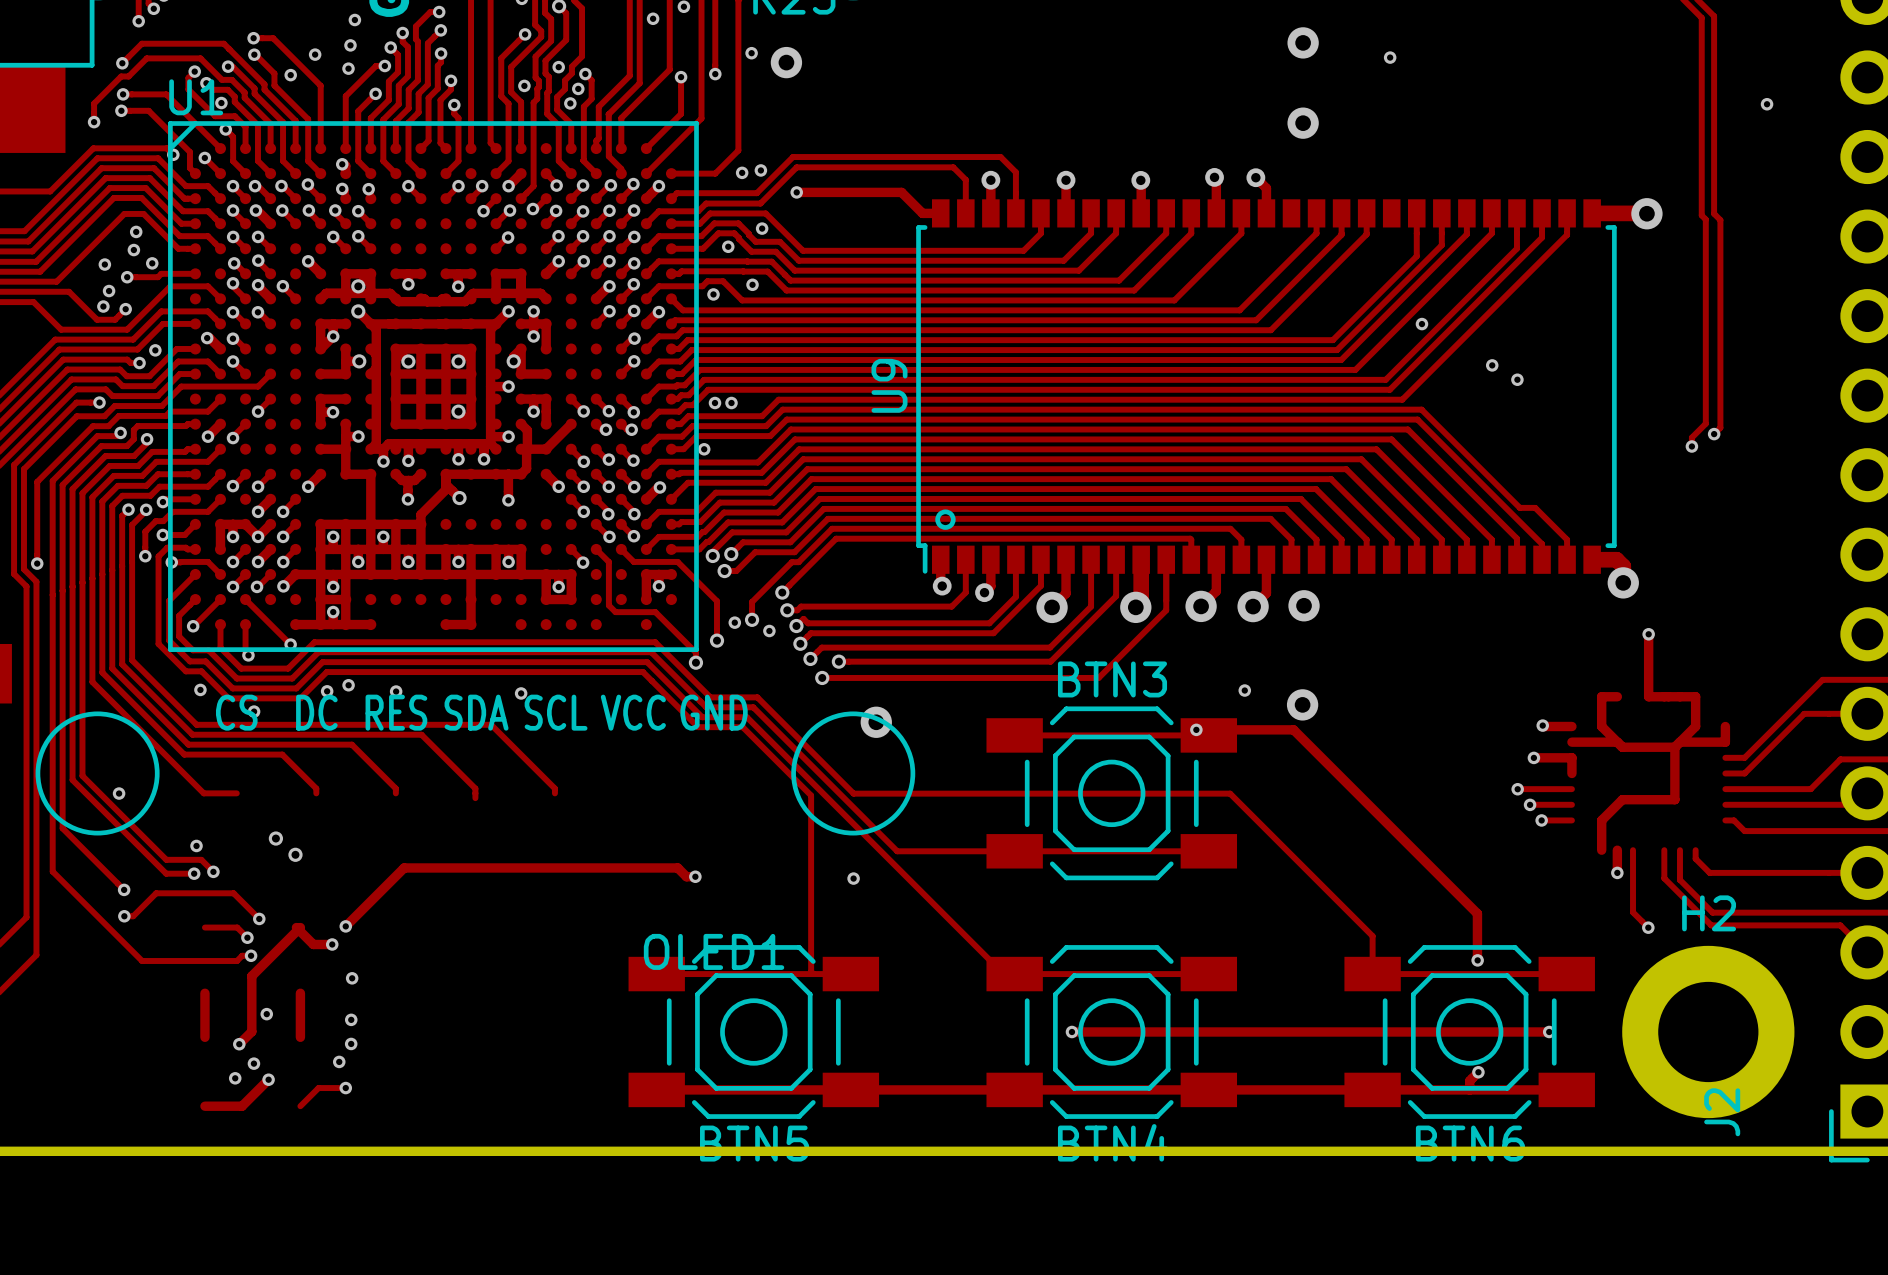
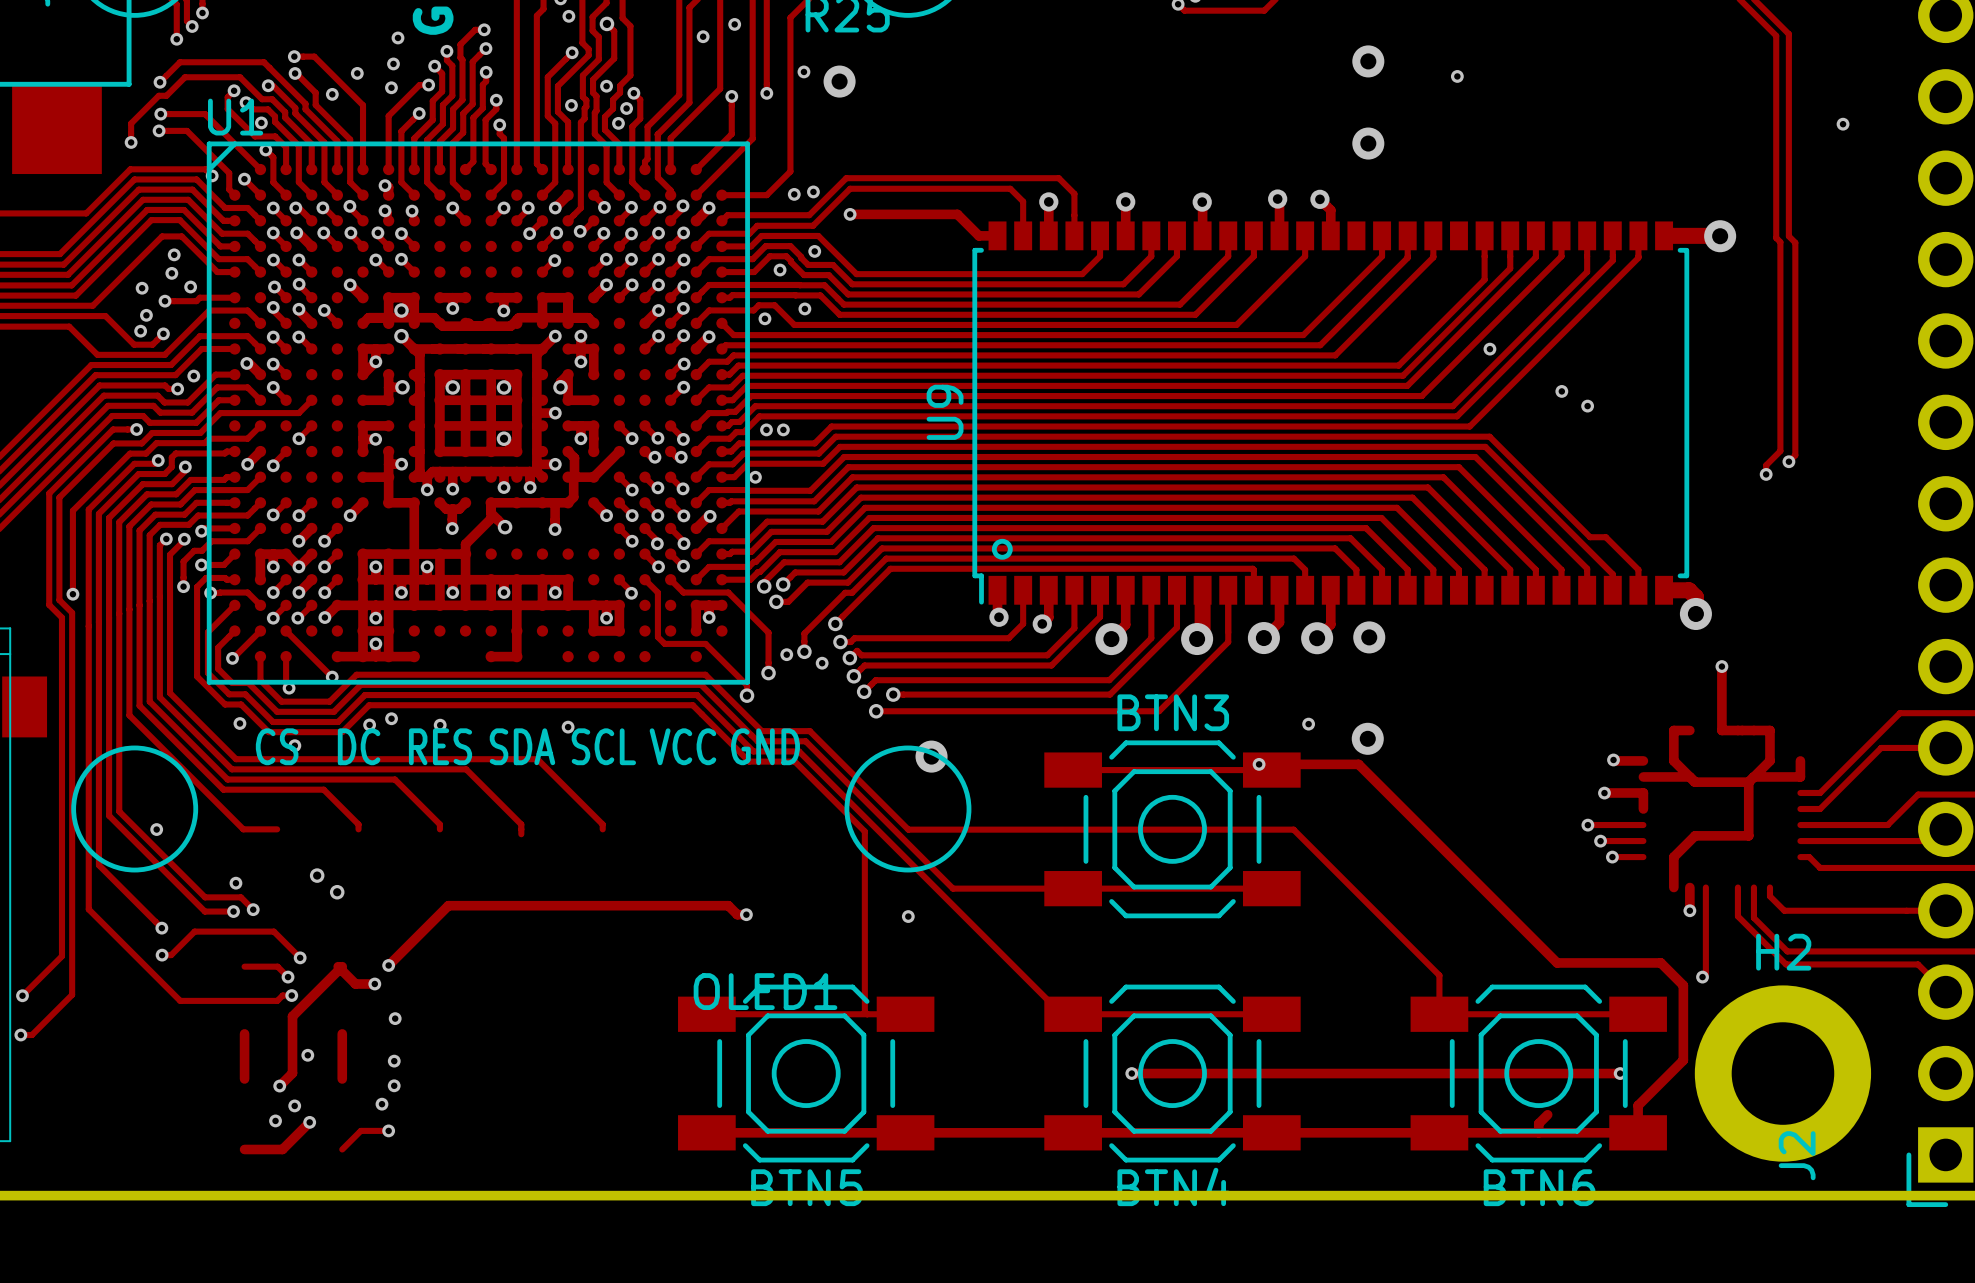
track: (1633, 912) (1648, 927) -> (1705, 951) (1705, 973) (1702, 977)
track: (1477, 913) (1477, 960) -> (1546, 952) (1557, 962) (1660, 962) (1683, 985) (1683, 1060) (1638, 1105) (1638, 1132)
via position: (1648, 927) -> (1702, 977)
via: (1477, 960) -> none
via: (1478, 1072) -> none

